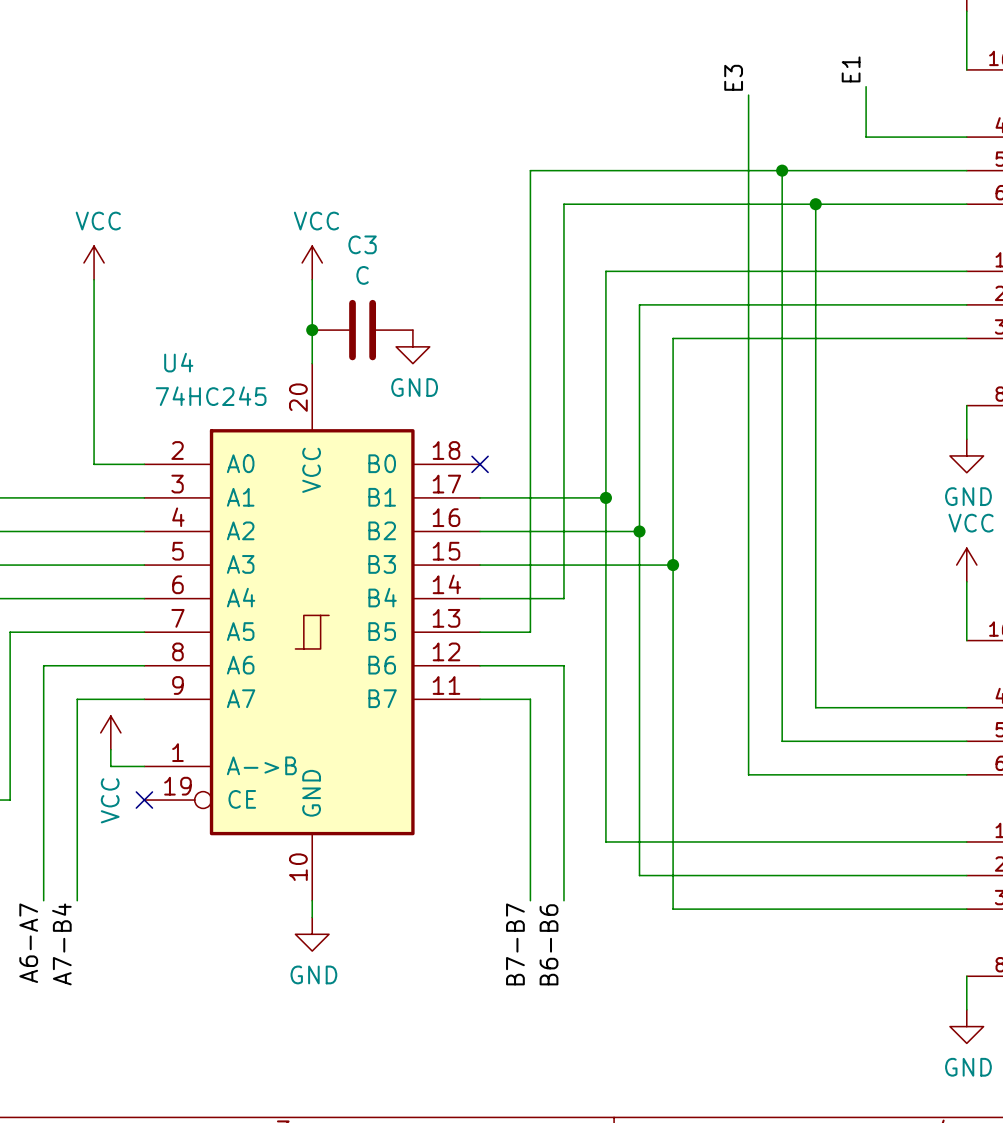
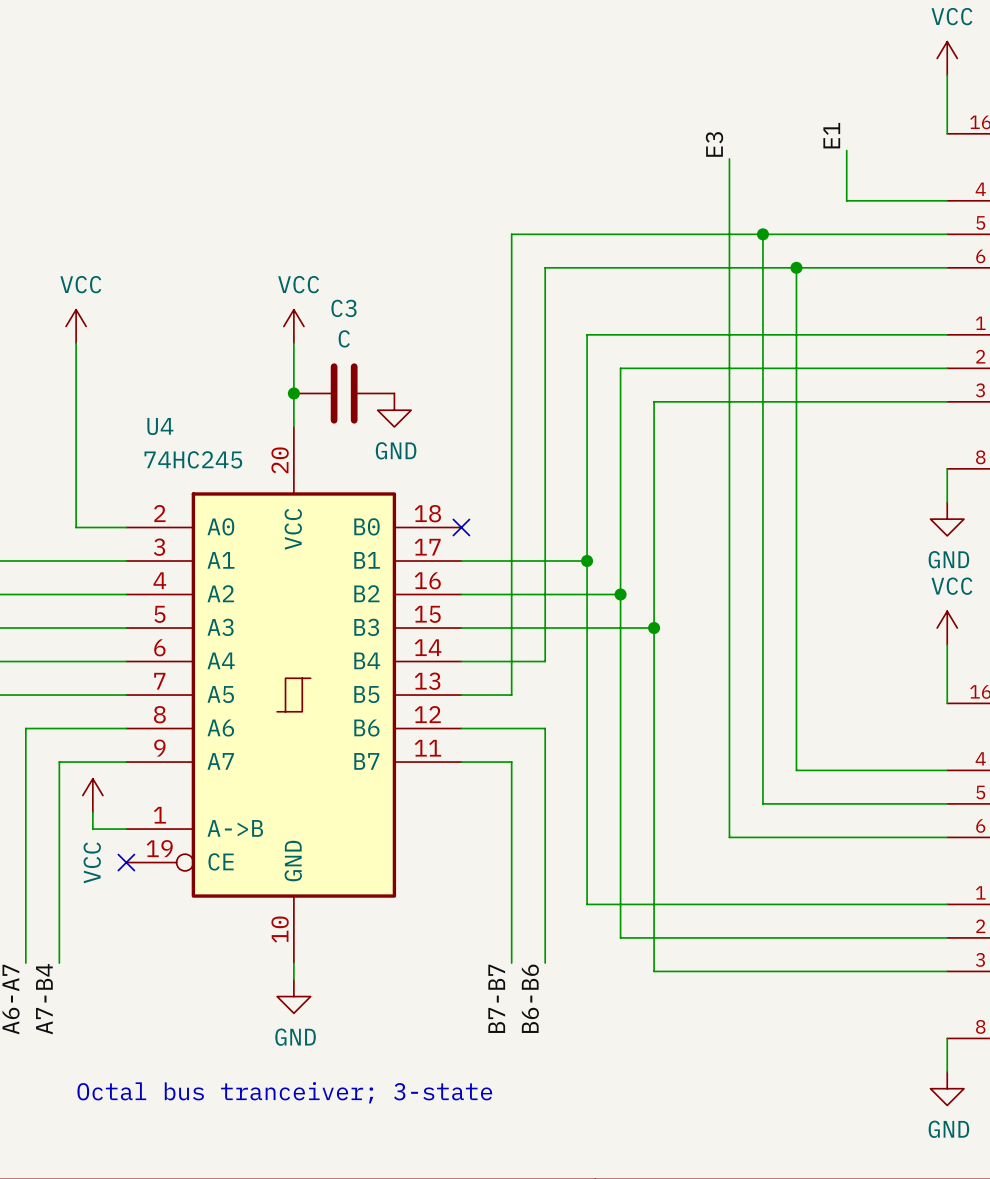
text: none -> Octal bus tranceiver; 3-state (284, 1092)

